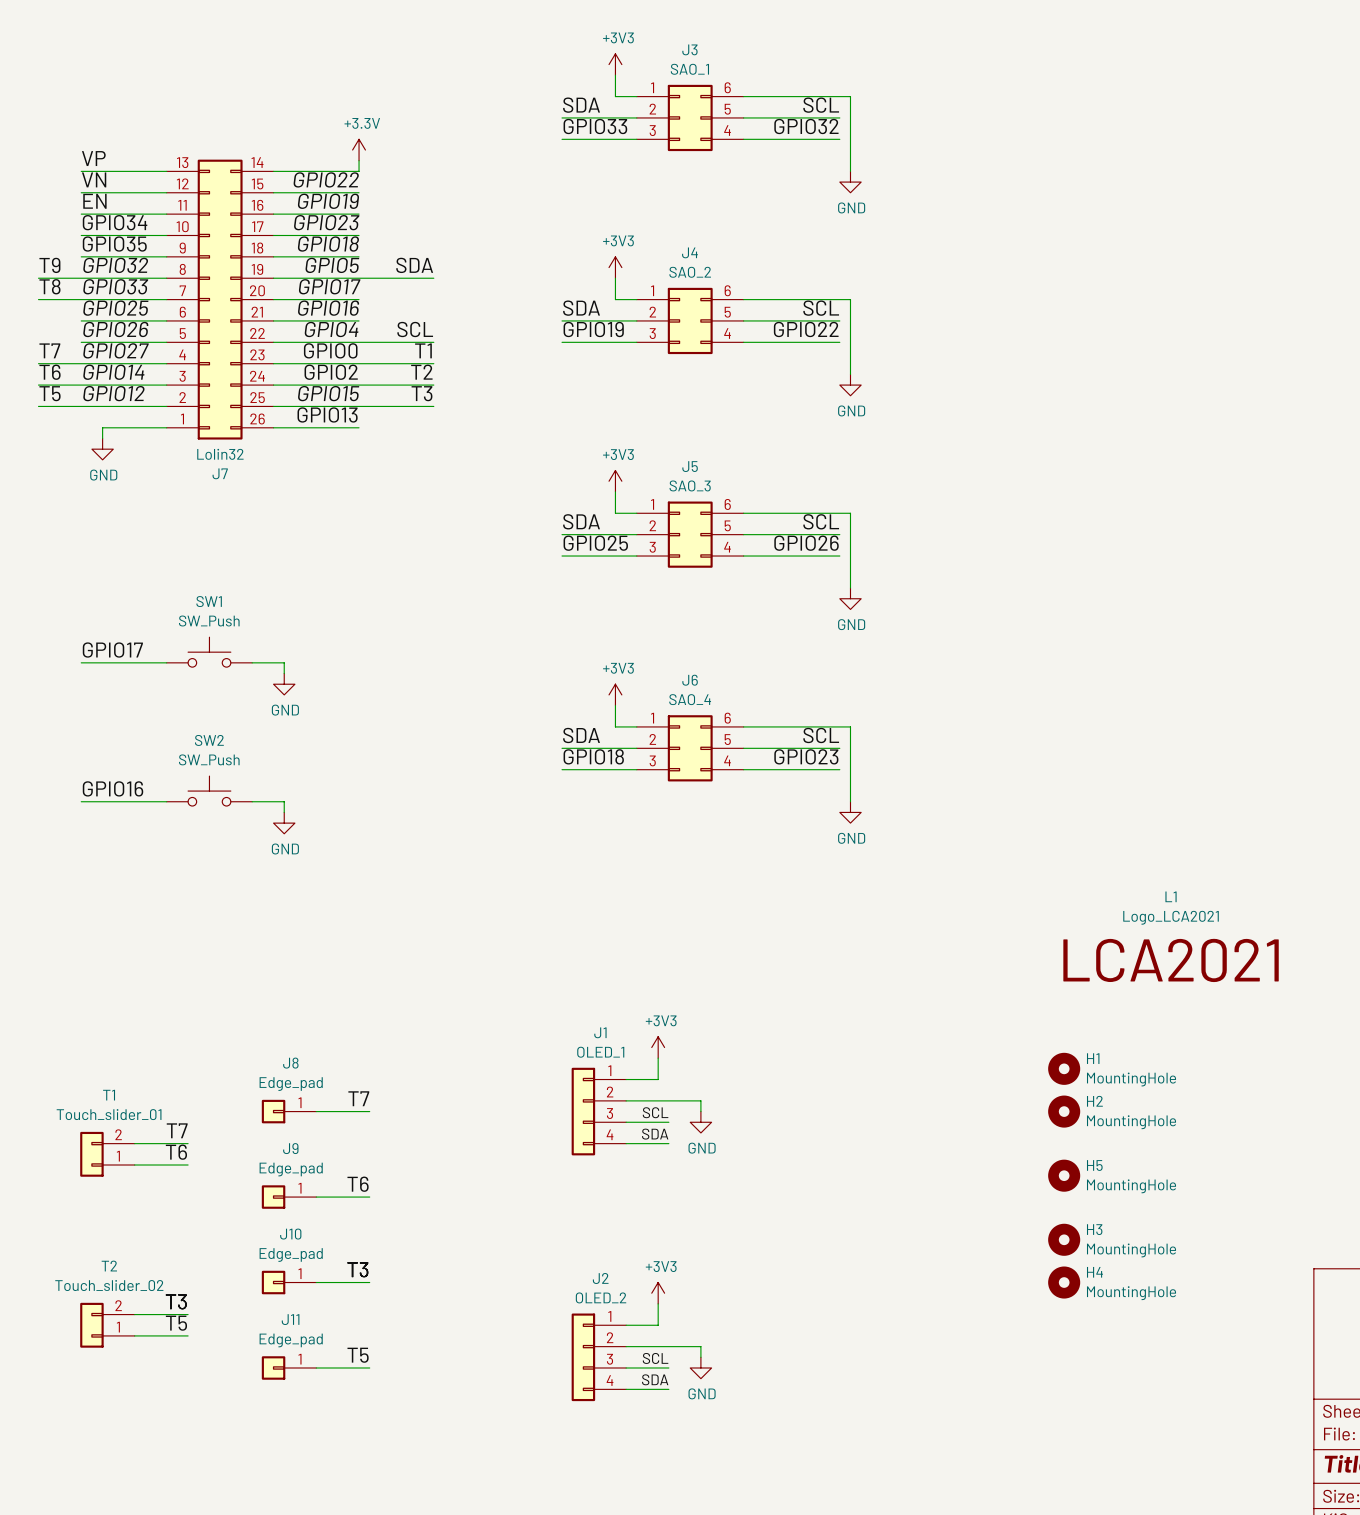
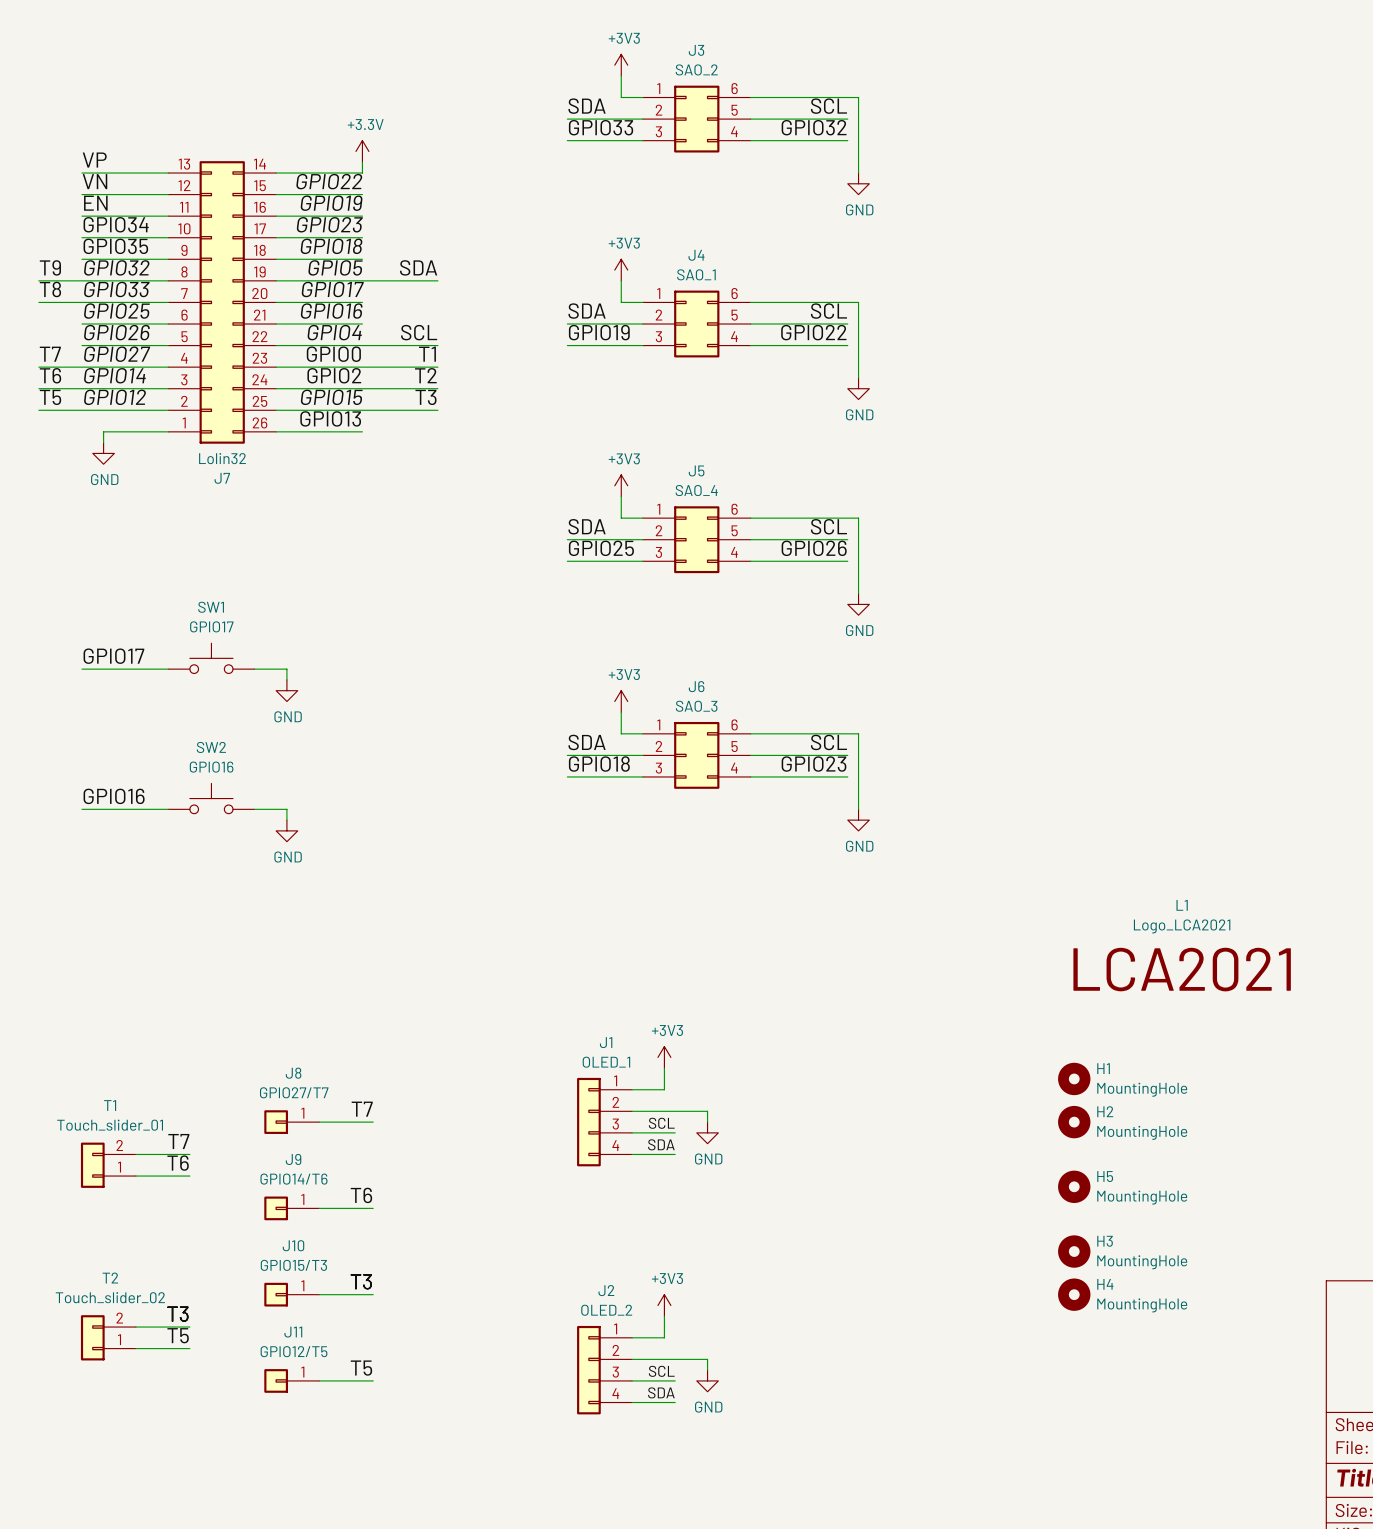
J3 value: SAO_1 (689, 69) -> SAO_2 (696, 69)
J4 value: SAO_2 (690, 272) -> SAO_1 (696, 274)
J5 value: SAO_3 (690, 485) -> SAO_4 (696, 490)
SW1 value: SW_Push (209, 621) -> GPIO17 (211, 626)
J6 value: SAO_4 (690, 699) -> SAO_3 (696, 706)
SW2 value: SW_Push (209, 759) -> GPIO16 (211, 767)
J8 value: Edge_pad (291, 1084) -> GPIO27/T7 (294, 1092)
J9 value: Edge_pad (291, 1169) -> GPIO14/T6 (294, 1179)
J10 value: Edge_pad (291, 1255) -> GPIO15/T3 (293, 1265)
J11 value: Edge_pad (291, 1340) -> GPIO12/T5 (294, 1351)

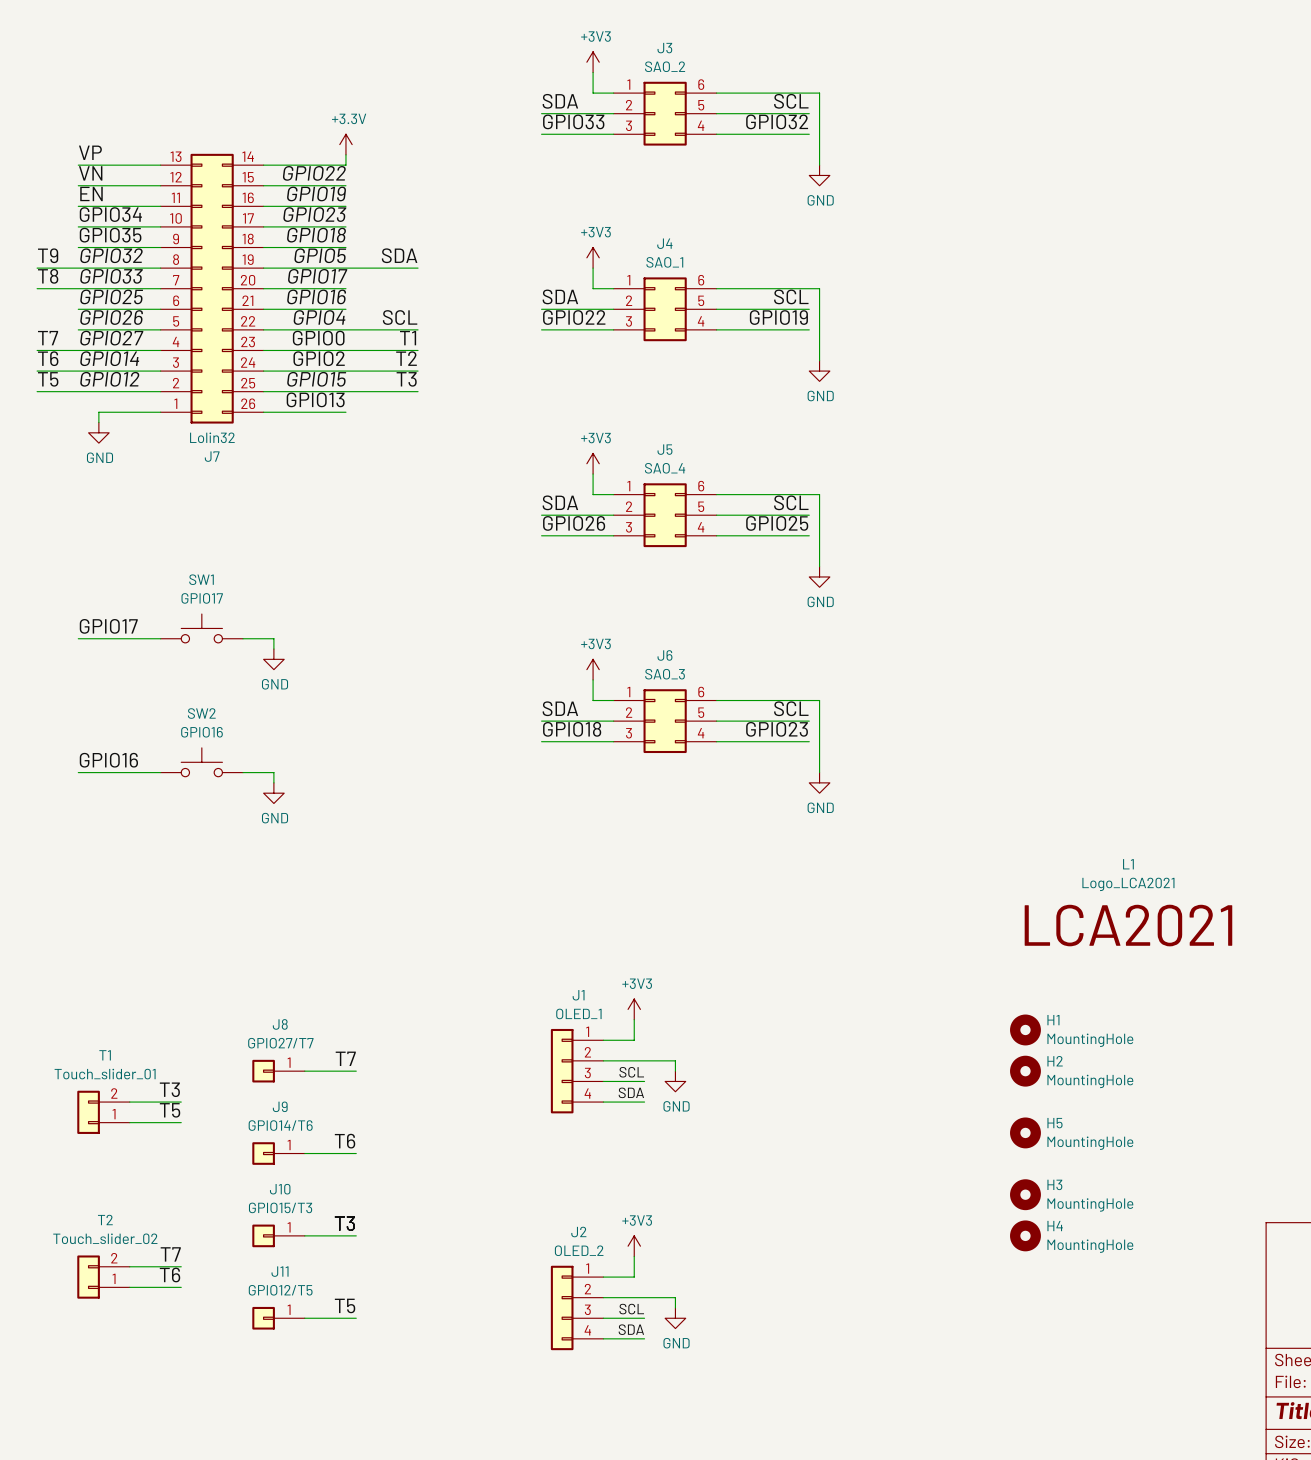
label: GPIO19 (599, 332) -> GPIO22 (574, 317)
label: GPIO22 (813, 332) -> GPIO19 (778, 317)
label: GPIO25 (601, 548) -> GPIO26 (574, 523)
label: GPIO26 (814, 548) -> GPIO25 (777, 523)
label: T7 (178, 1141) -> T3 (169, 1089)
label: T6 (178, 1163) -> T5 (170, 1110)
label: T3 (177, 1314) -> T7 (170, 1254)
label: T5 (178, 1335) -> T6 (170, 1274)

